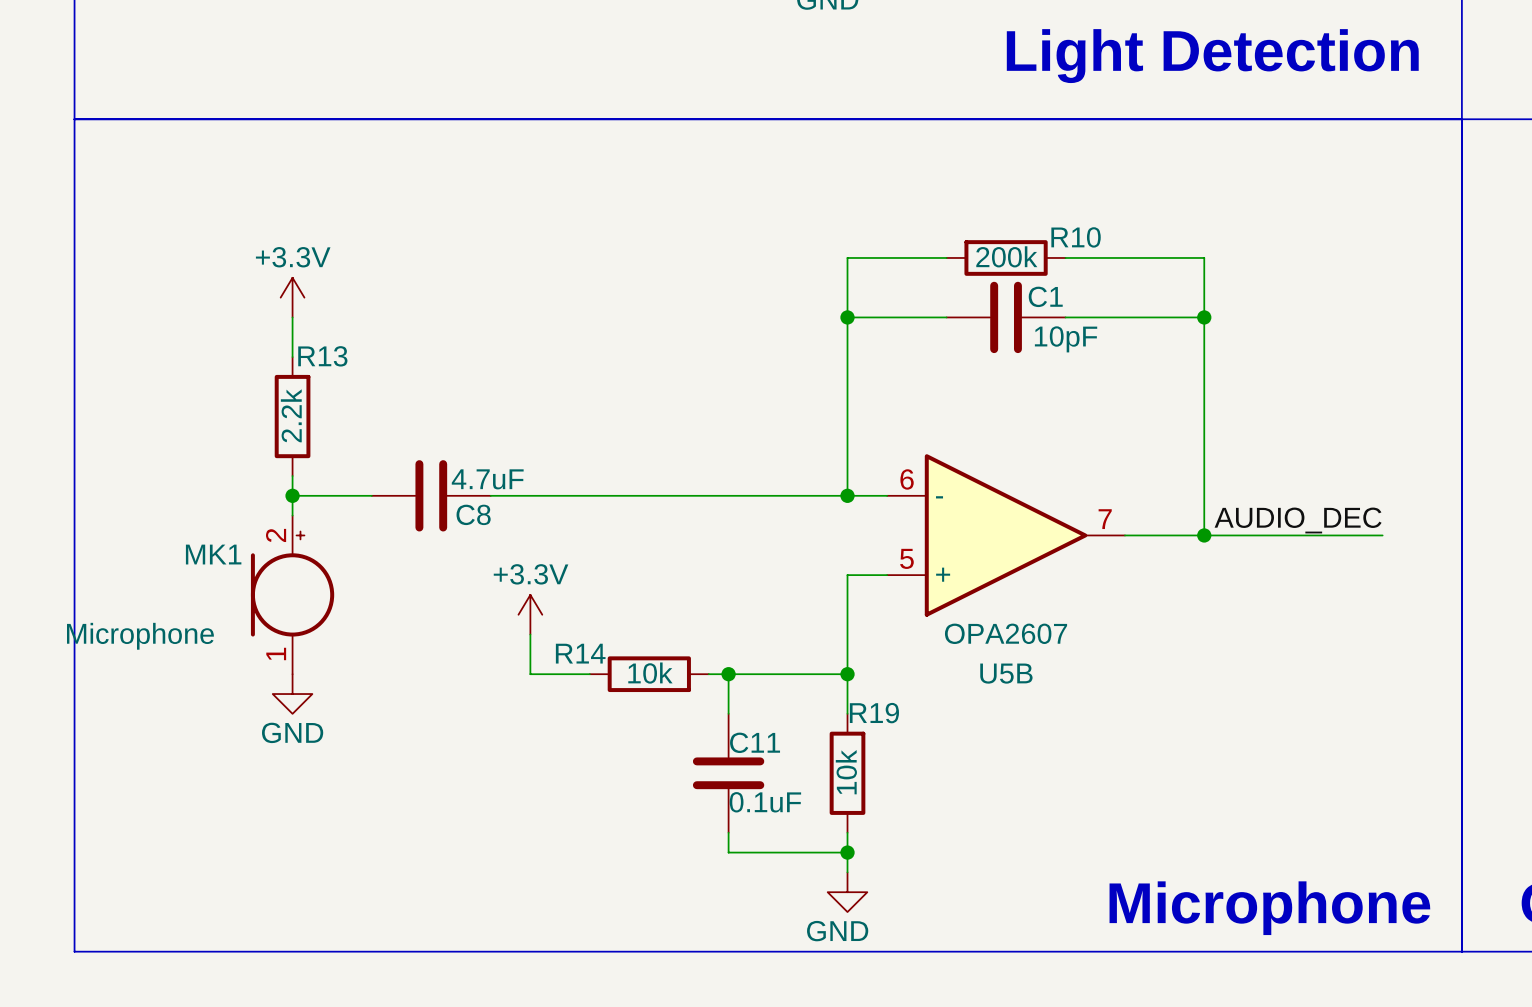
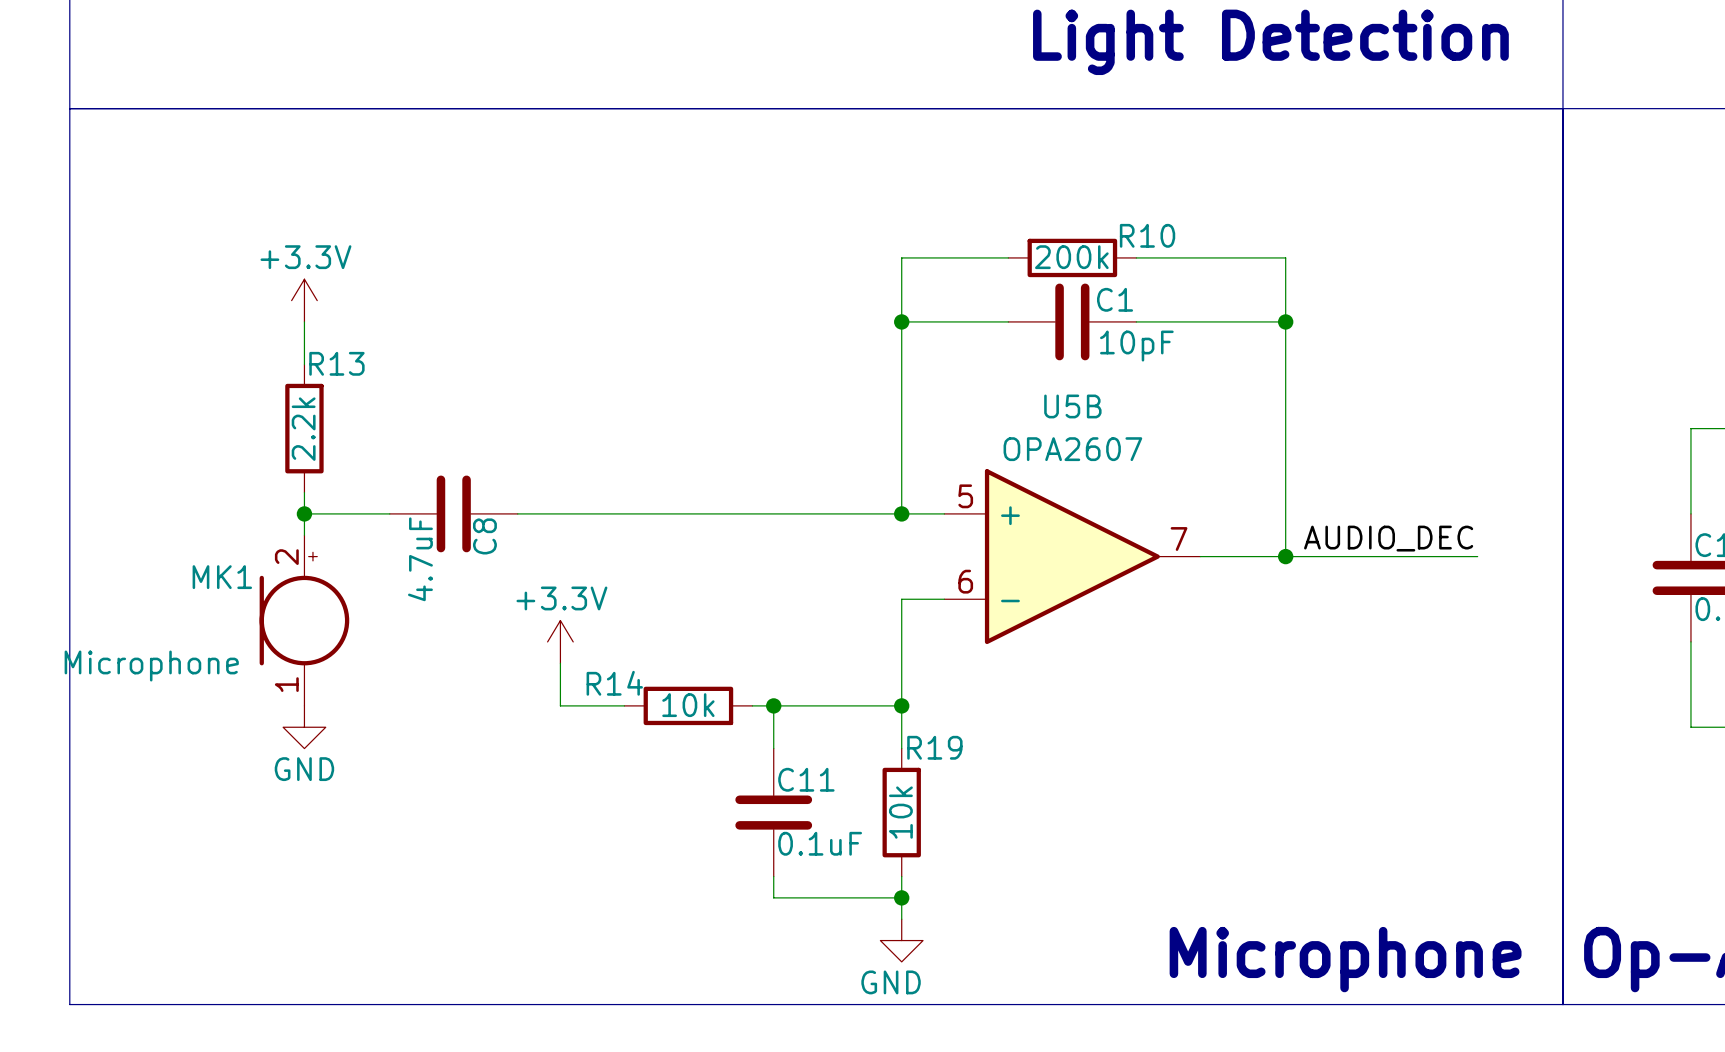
C8 value rotation: 0° (487, 479) -> 90° counterclockwise (420, 559)
C8 value position: 4.7uF (487, 479) -> 4.7uF (420, 559)
C8 name rotation: 0° (473, 514) -> 90° counterclockwise (484, 536)
U5B flip: as is (1006, 535) -> up-down (1072, 556)

